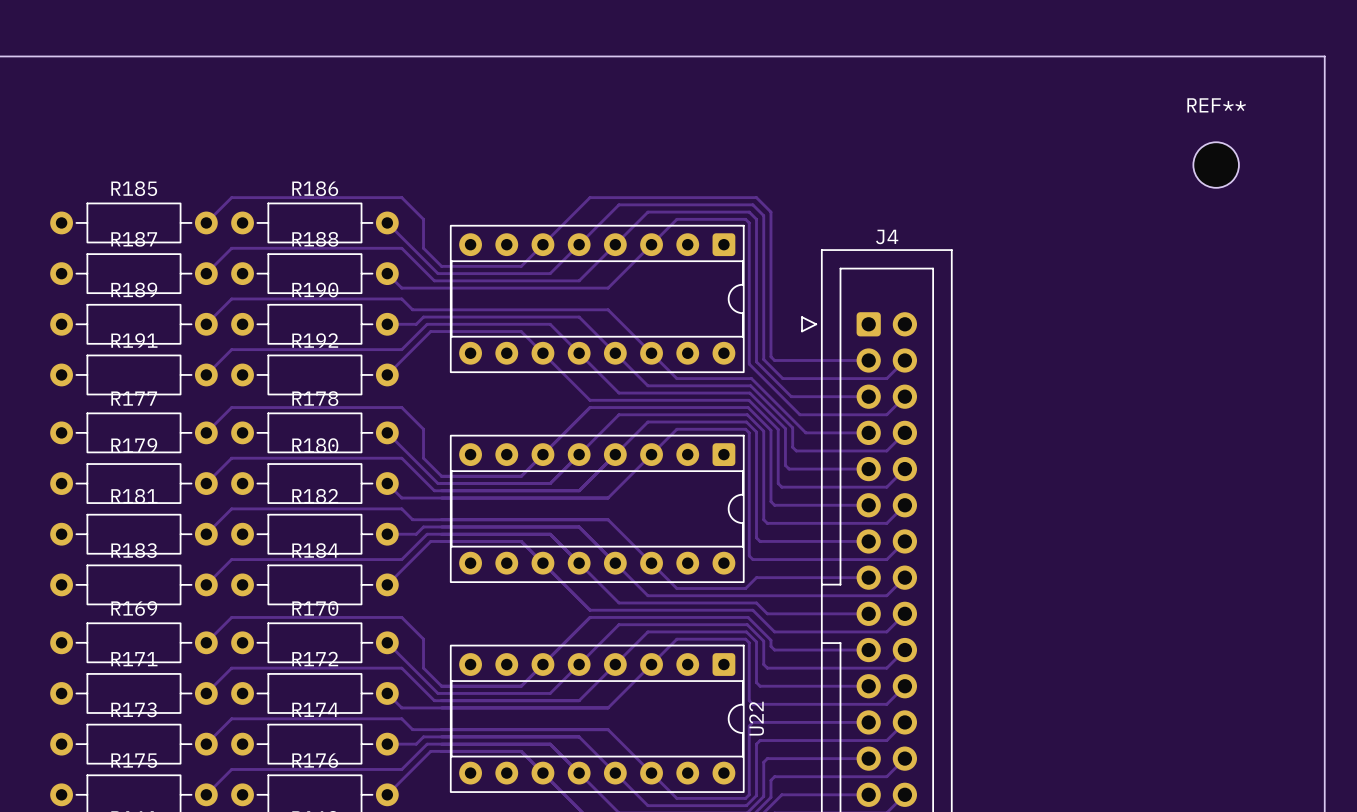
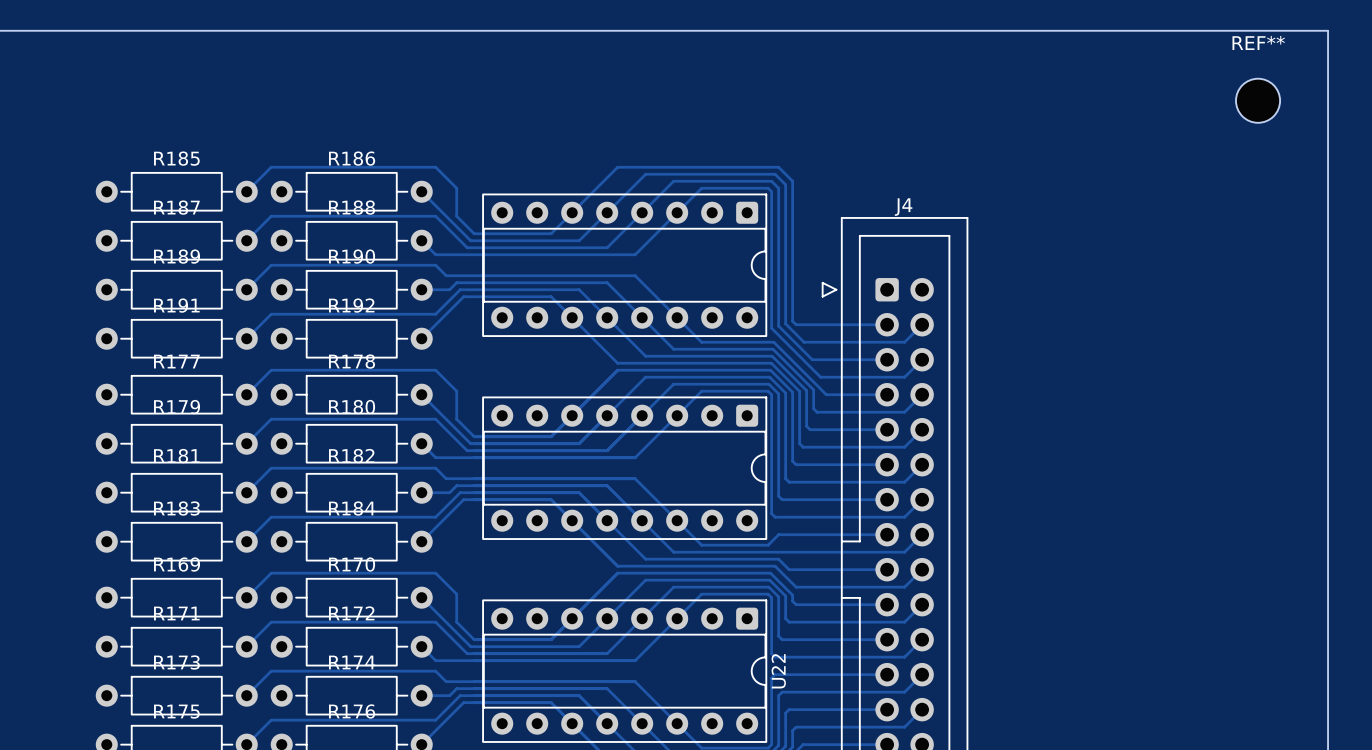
REF** position: (1216, 165) -> (1258, 100)

